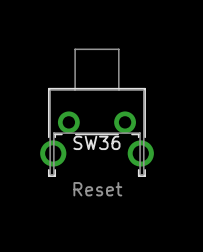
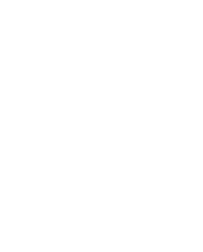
SW36: Reset (97, 112) -> none

